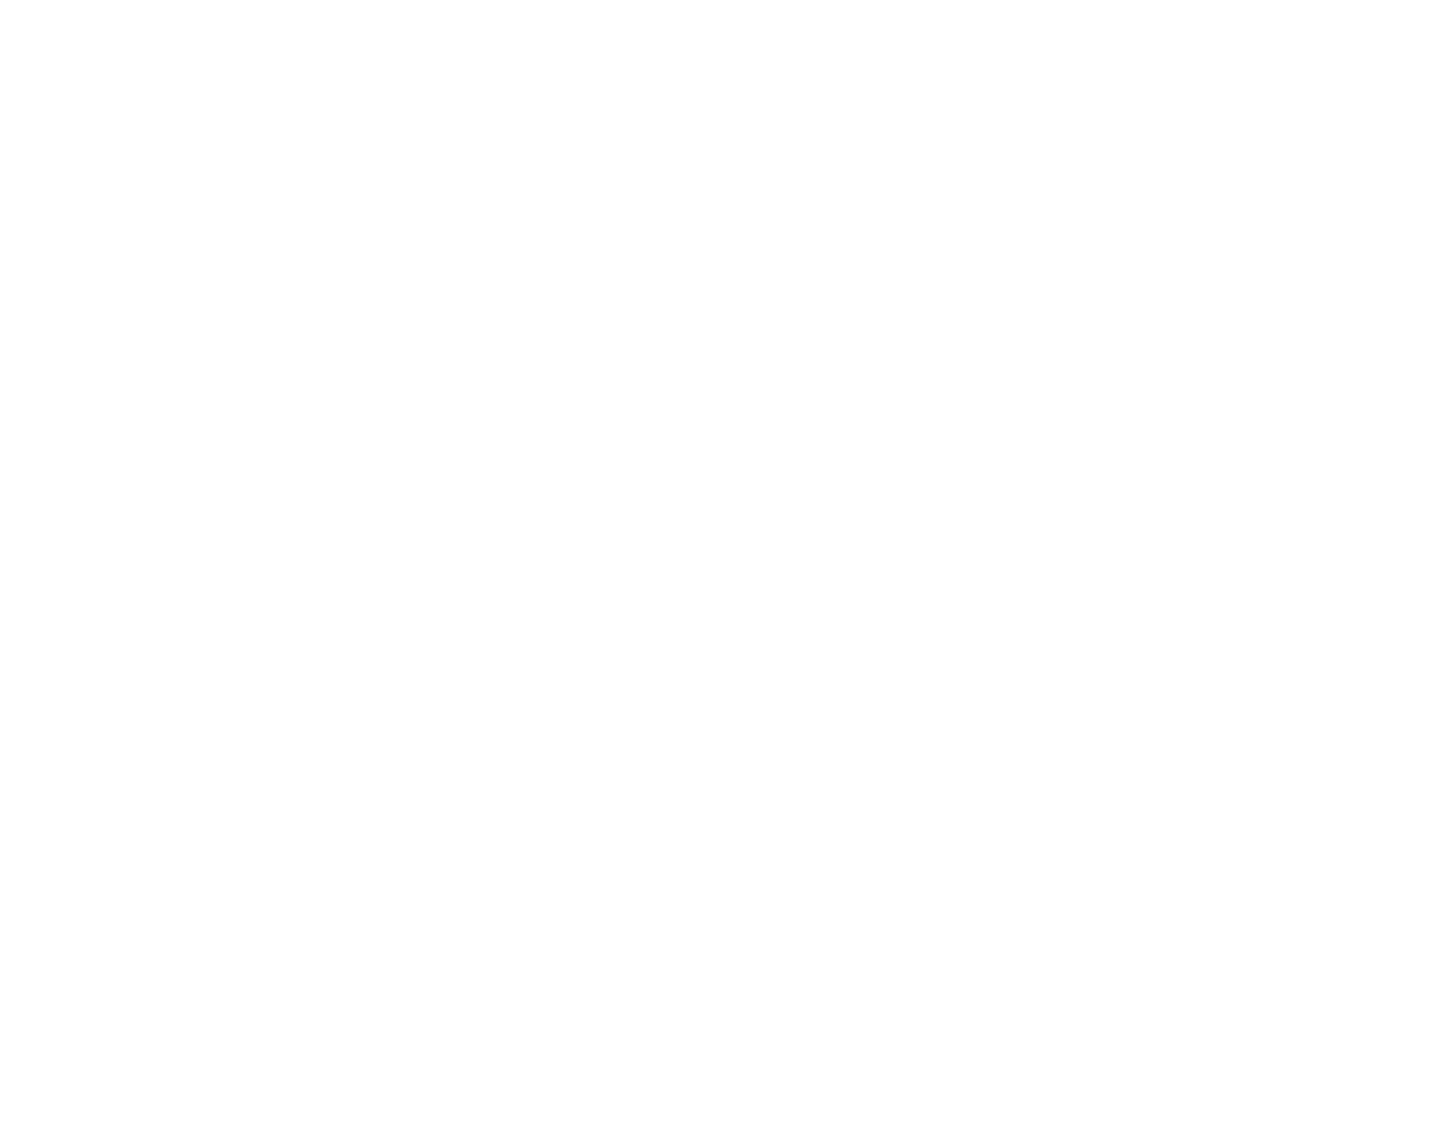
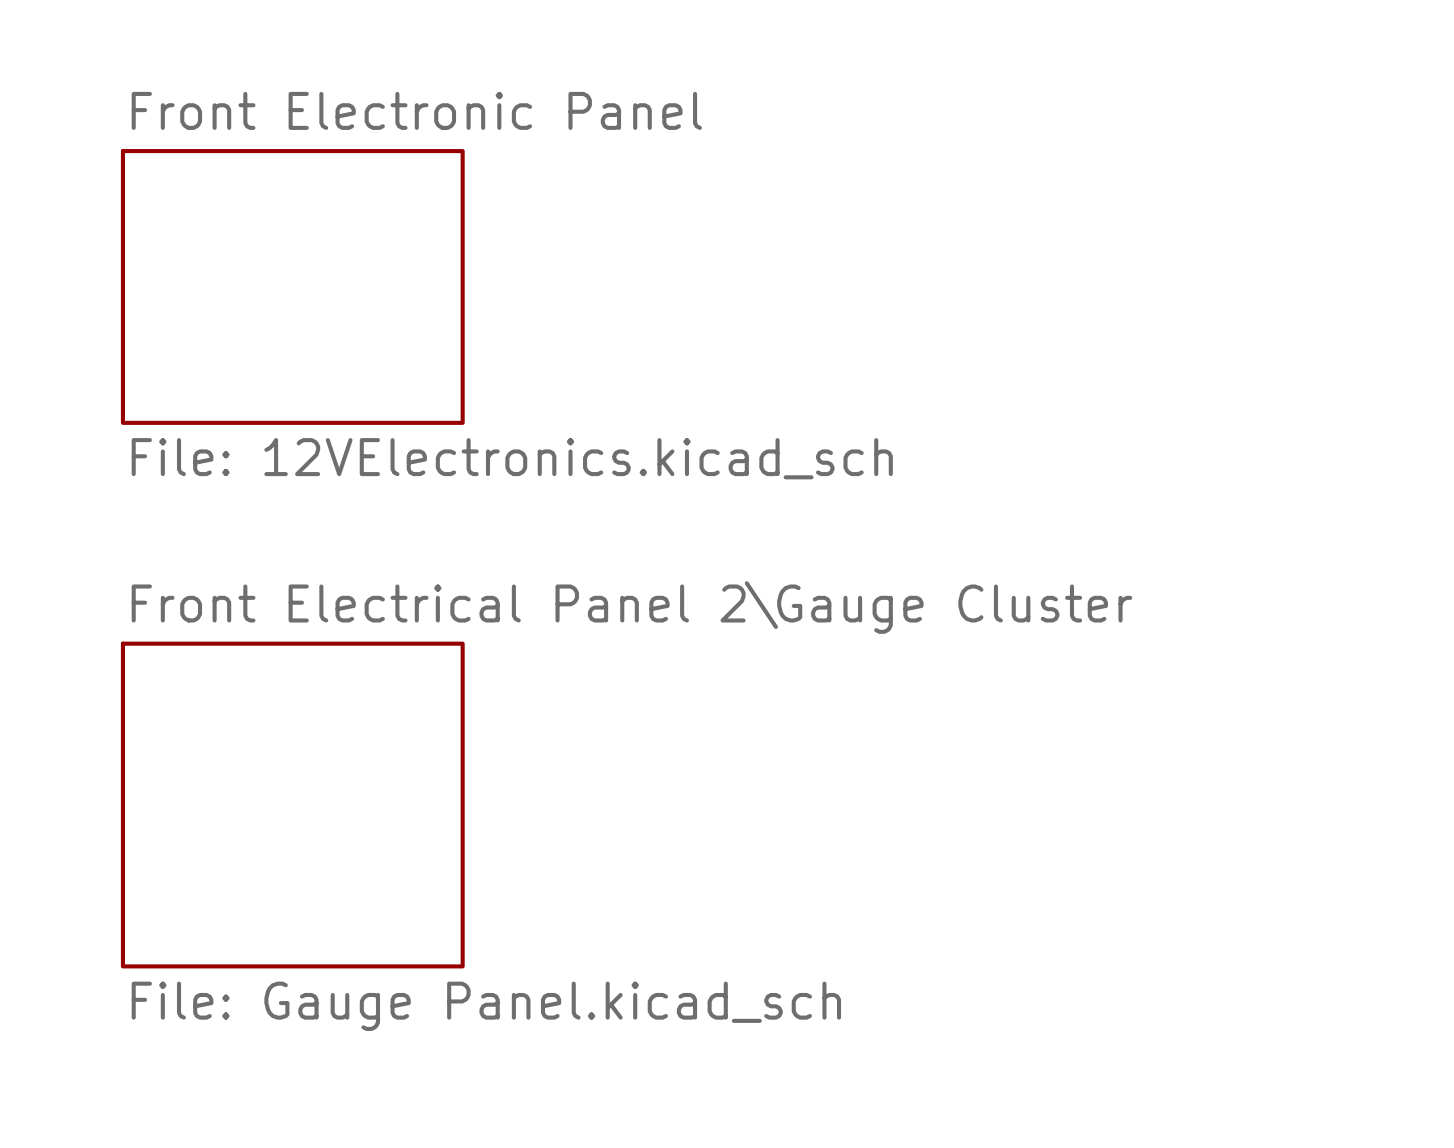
sheet Front Electronic Panel: none -> File: 12VElectronics.kicad_sch (292, 286)
sheet Front Electrical Panel 2\Gauge Cluster: none -> File: Gauge Panel.kicad_sch (292, 805)

